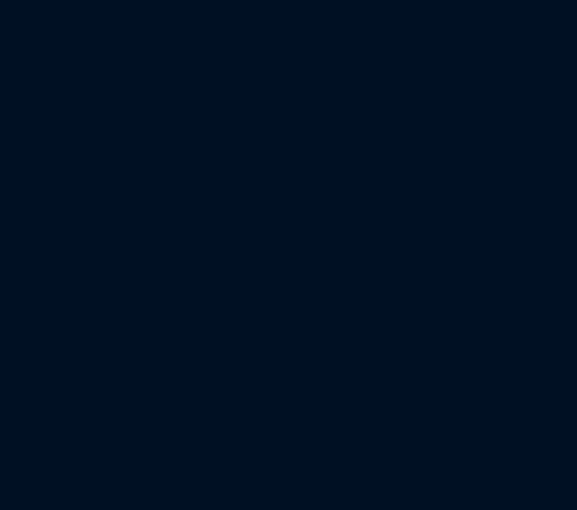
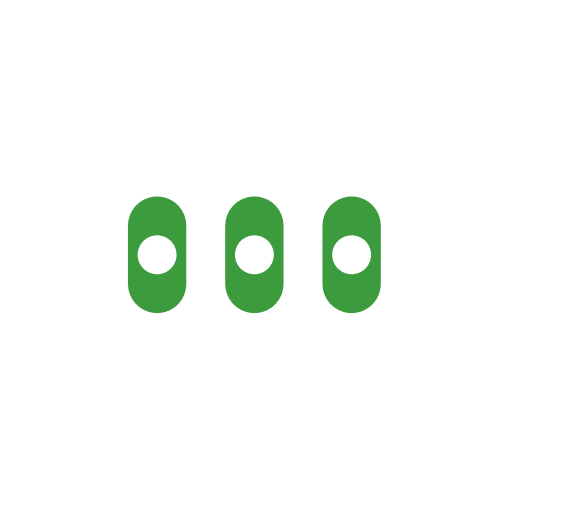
part: none -> (254, 254)

